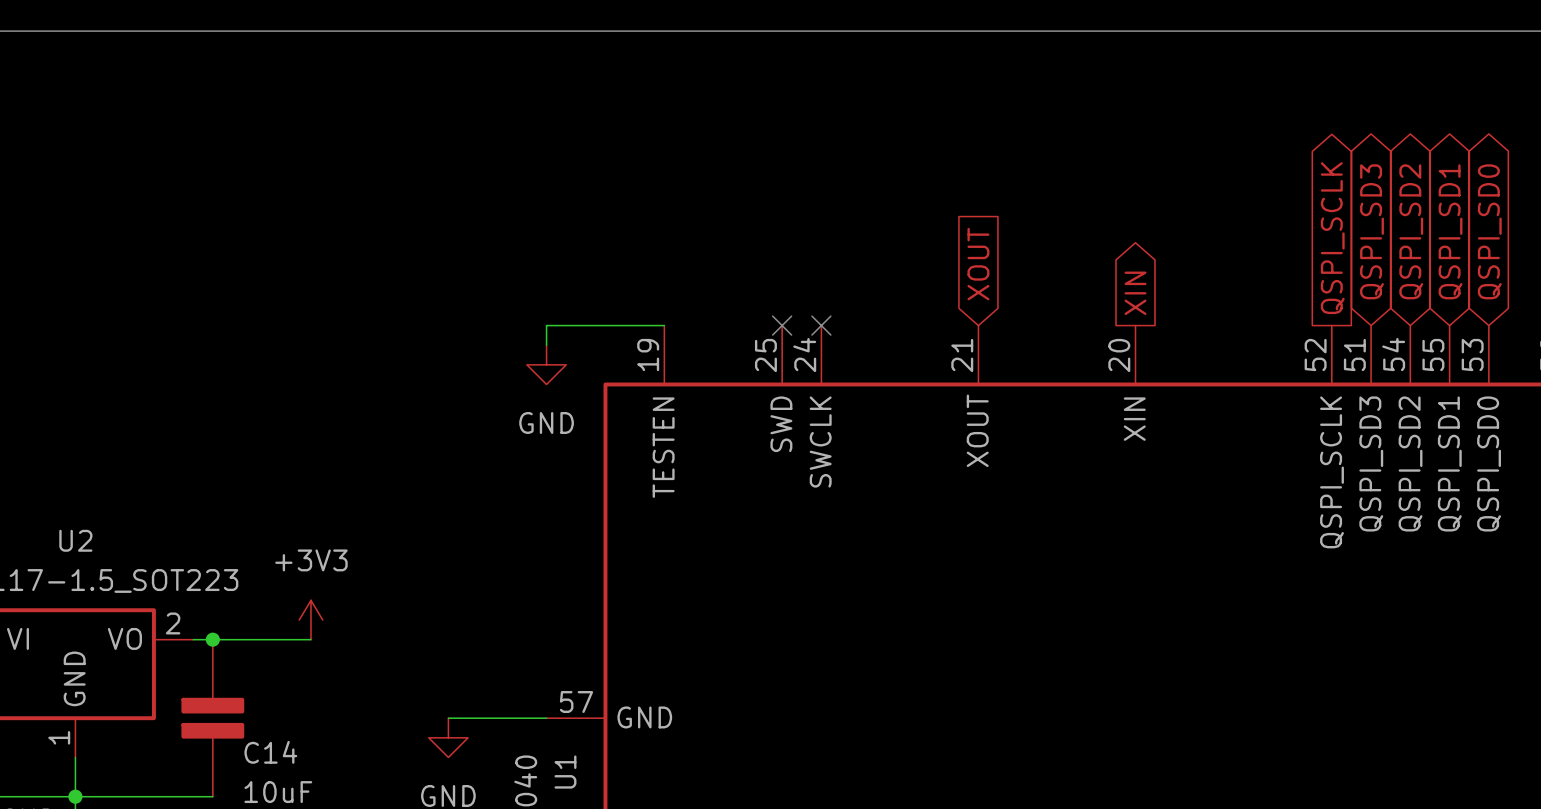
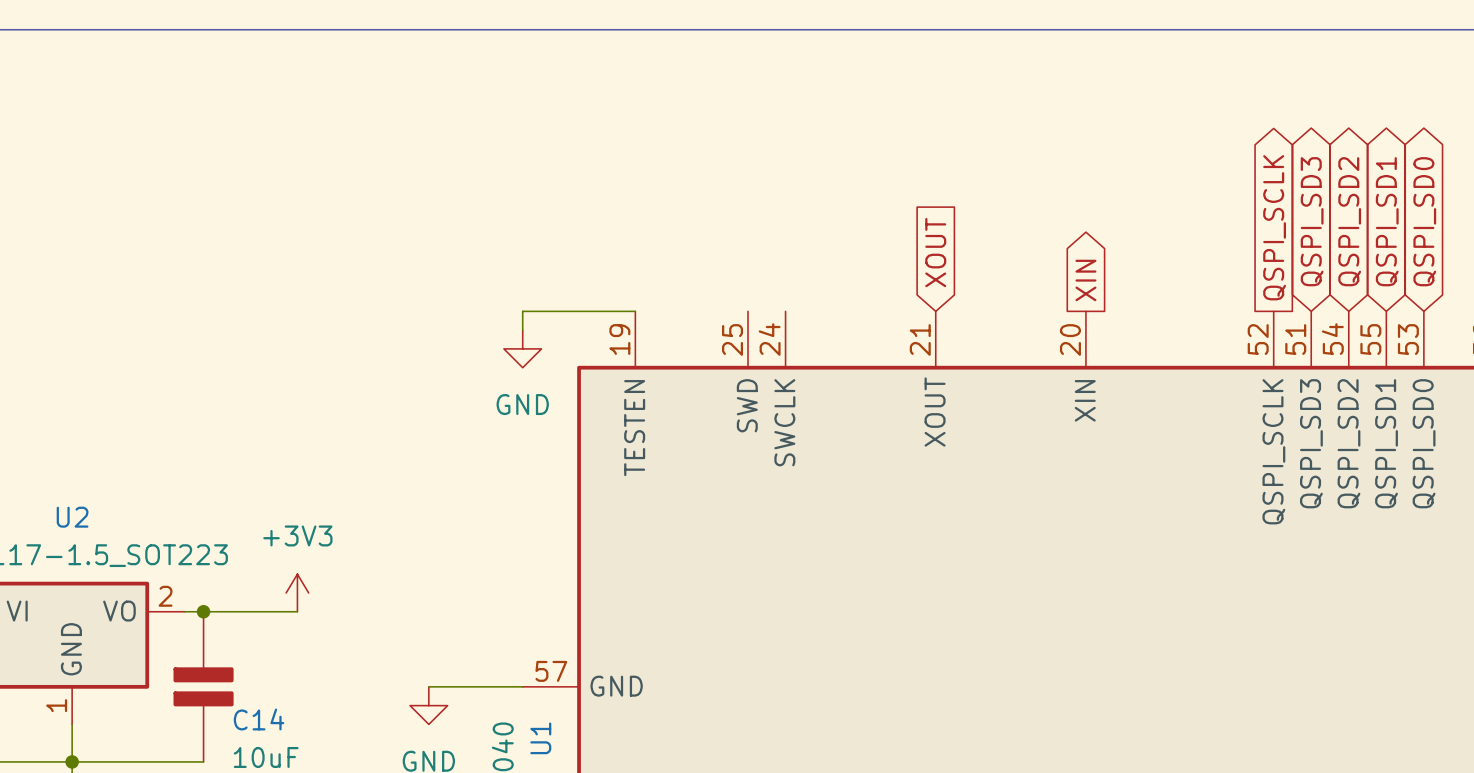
no-connect mark: (782, 325) -> none
no-connect mark: (821, 325) -> none

